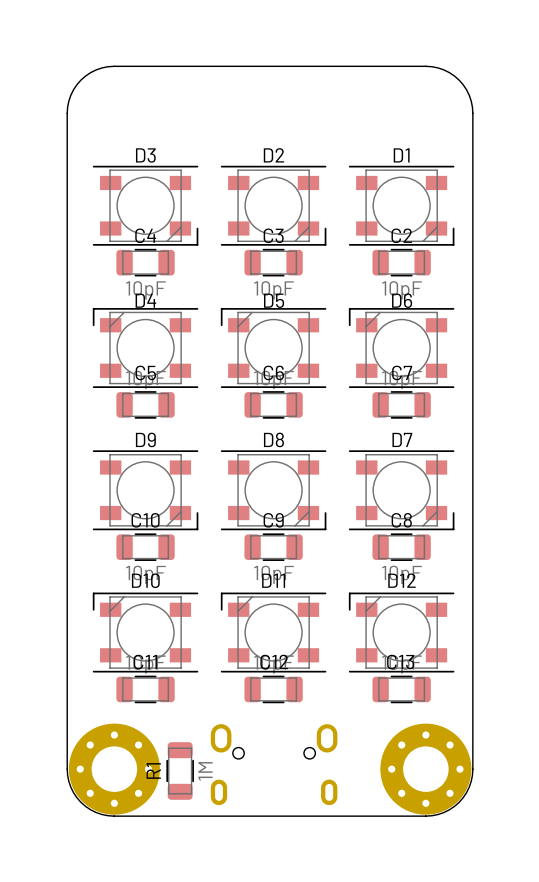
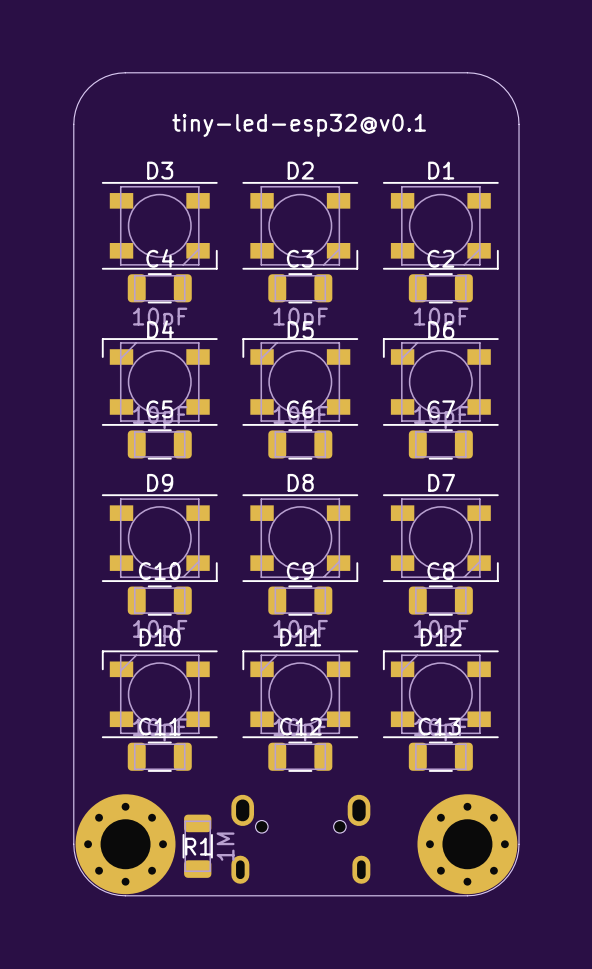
text: none -> tiny-led-esp32@v0.1 (299, 125)
R1 name rotation: 0° (153, 770) -> 90° clockwise (198, 846)

